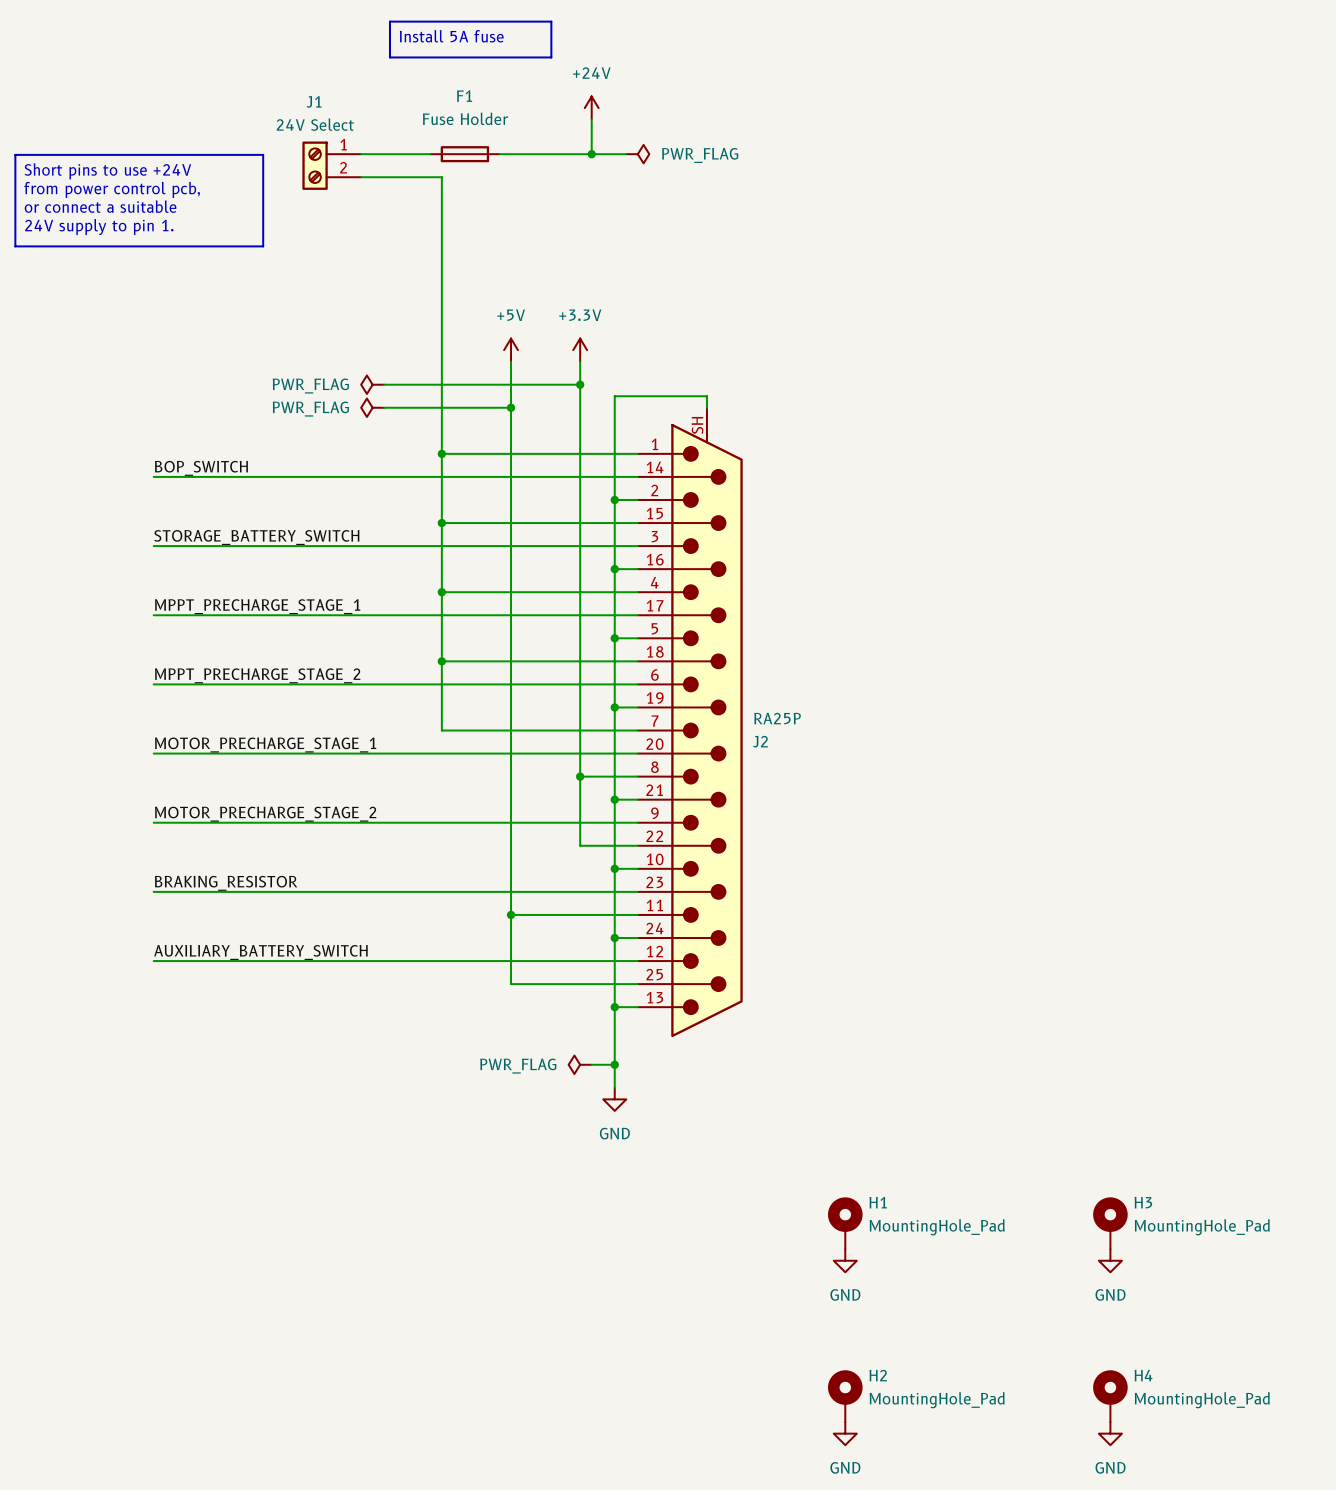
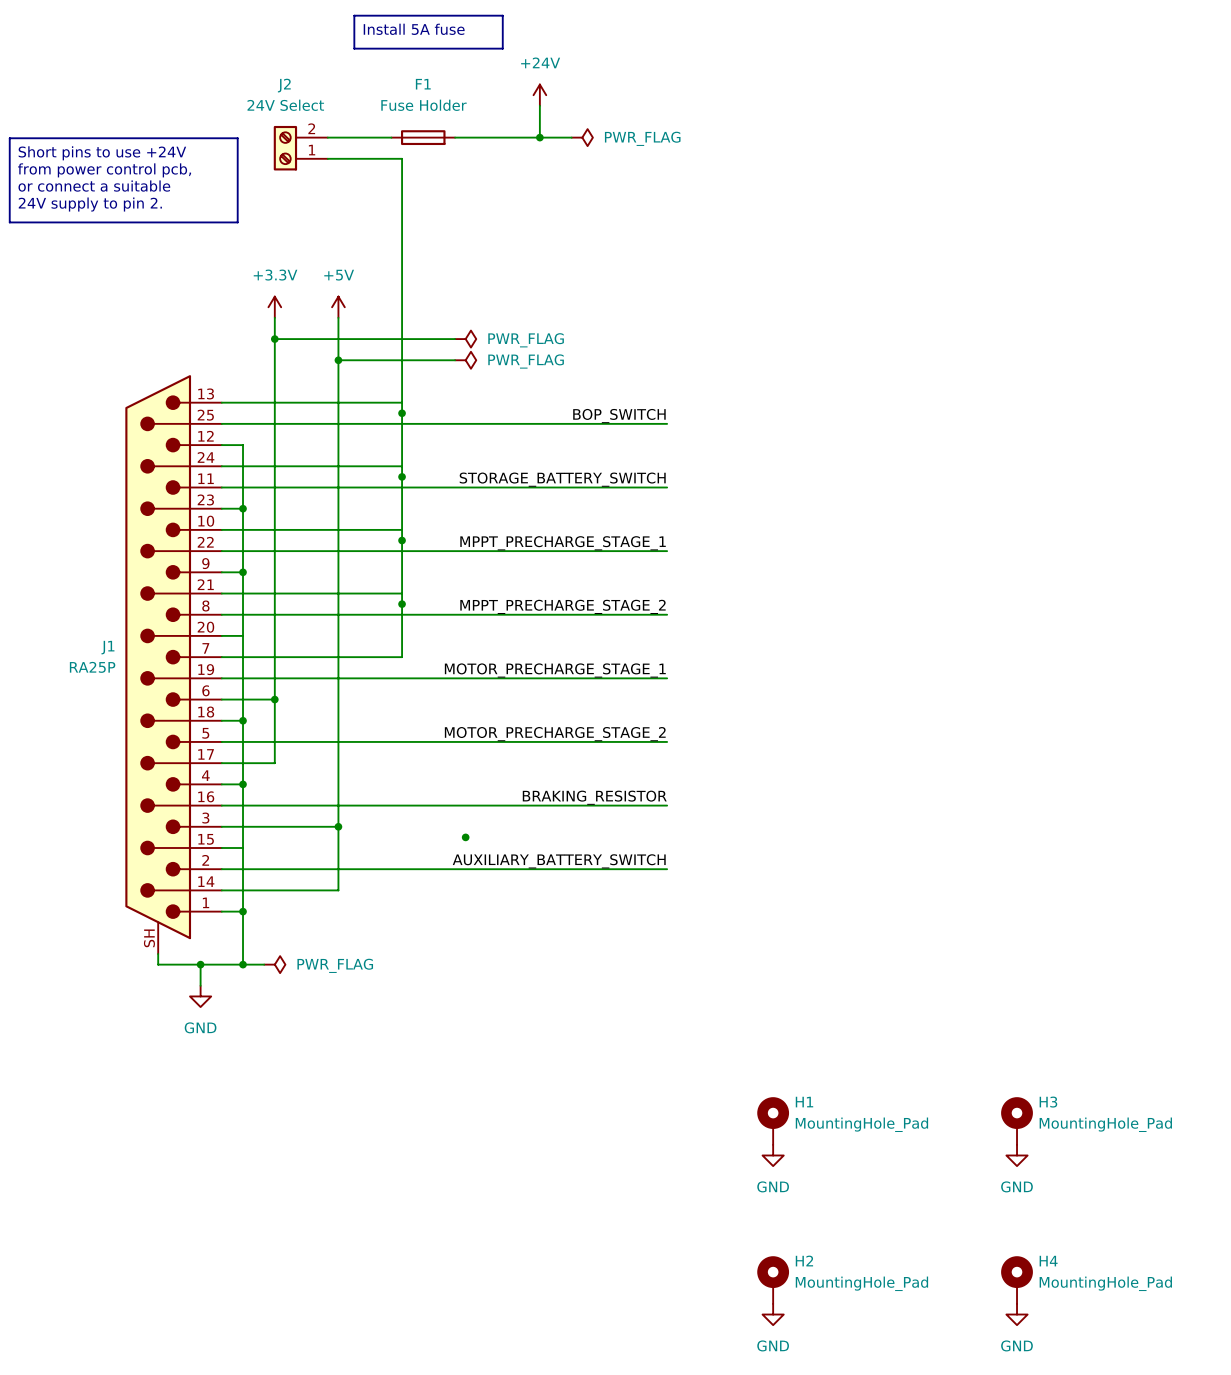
J1 name position: J1 (314, 101) -> J1 (107, 647)
J1 value: 24V Select (315, 124) -> RA25P (92, 667)
J1 symbol: [302, 141, 362, 190] -> [125, 375, 222, 955]
text: 24V supply to pin 1. (99, 227) -> 24V supply to pin 2. (90, 204)
power symbol: none -> +3.3V (274, 307)
wire: none -> (274, 317) (274, 763) (221, 763)
wire: none -> (338, 317) (338, 890) (221, 890)
power symbol position: +5V (511, 350) -> +5V (338, 307)
power symbol: +3.3V (580, 350) -> none
wire: (511, 361) (511, 984) (637, 984) -> none
wire: (580, 361) (580, 845) (637, 845) -> none
junction: none -> (274, 339)
power symbol: none -> PWR_FLAG (465, 339)
power symbol: PWR_FLAG (372, 384) -> none
wire: (384, 384) (580, 384) -> (274, 339) (455, 339)
junction: (580, 384) -> none
junction: none -> (338, 360)
power symbol: none -> PWR_FLAG (465, 360)
power symbol: PWR_FLAG (372, 407) -> none
wire: (384, 407) (511, 407) -> (338, 360) (455, 360)
junction: (511, 407) -> none
J2 symbol: [637, 407, 743, 1038] -> [273, 125, 328, 171]
wire: (706, 407) (706, 396) (614, 396) (614, 1087) -> none
wire: (441, 453) (637, 453) -> (221, 402) (402, 402)
label: none -> BOP_SWITCH (619, 416)
label: BOP_SWITCH (201, 468) -> none
wire: (153, 476) (637, 476) -> (221, 423) (667, 423)
wire: none -> (221, 445) (243, 445) (243, 964)
wire: (614, 499) (637, 499) -> none
junction: (614, 499) -> none
wire: (441, 523) (637, 523) -> (221, 466) (402, 466)
label: none -> STORAGE_BATTERY_SWITCH (562, 479)
label: STORAGE_BATTERY_SWITCH (256, 537) -> none
wire: (153, 546) (637, 546) -> (221, 487) (667, 487)
wire: none -> (221, 508) (243, 508)
junction: none -> (243, 508)
wire: (614, 569) (637, 569) -> none
junction: (614, 569) -> none
wire: (441, 592) (637, 592) -> (221, 529) (402, 529)
label: none -> MPPT_PRECHARGE_STAGE_1 (563, 543)
label: MPPT_PRECHARGE_STAGE_1 (257, 606) -> none
wire: (153, 615) (637, 615) -> (221, 551) (667, 551)
wire: none -> (221, 572) (243, 572)
junction: none -> (243, 572)
wire: (614, 638) (637, 638) -> none
junction: (614, 638) -> none
wire: (441, 661) (637, 661) -> (221, 593) (402, 593)
label: none -> MPPT_PRECHARGE_STAGE_2 (562, 606)
label: MPPT_PRECHARGE_STAGE_2 (257, 675) -> none
wire: (153, 684) (637, 684) -> (221, 614) (667, 614)
wire: none -> (221, 635) (243, 635)
wire: (614, 707) (637, 707) -> none
junction: (614, 707) -> none
wire: (441, 718) (441, 730) (637, 730) -> (402, 657) (221, 657)
J2 value: RA25P (777, 718) -> 24V Select (285, 105)
label: none -> MOTOR_PRECHARGE_STAGE_1 (555, 670)
J2 name position: J2 (760, 741) -> J2 (284, 85)
label: MOTOR_PRECHARGE_STAGE_1 (265, 745) -> none
wire: (153, 753) (637, 753) -> (221, 678) (667, 678)
wire: none -> (221, 699) (274, 699)
junction: none -> (274, 699)
wire: (580, 776) (637, 776) -> none
junction: (580, 776) -> none
wire: none -> (221, 720) (243, 720)
junction: none -> (243, 720)
wire: (614, 799) (637, 799) -> none
junction: (614, 799) -> none
label: none -> MOTOR_PRECHARGE_STAGE_2 (555, 734)
label: MOTOR_PRECHARGE_STAGE_2 (265, 814) -> none
wire: (153, 822) (637, 822) -> (221, 741) (667, 741)
wire: none -> (221, 784) (243, 784)
junction: none -> (243, 784)
wire: (614, 868) (637, 868) -> none
junction: (614, 868) -> none
label: none -> BRAKING_RESISTOR (594, 797)
label: BRAKING_RESISTOR (226, 883) -> none
wire: (153, 891) (637, 891) -> (221, 805) (667, 805)
wire: none -> (221, 826) (338, 826)
junction: none -> (338, 826)
wire: (511, 914) (637, 914) -> none
wire: none -> (221, 848) (243, 848)
wire: (614, 938) (637, 938) -> none
junction: (614, 938) -> none
label: none -> AUXILIARY_BATTERY_SWITCH (559, 861)
label: AUXILIARY_BATTERY_SWITCH (260, 952) -> none
wire: (153, 961) (637, 961) -> (221, 869) (667, 869)
wire: none -> (221, 911) (243, 911)
junction: none -> (243, 911)
wire: (614, 1007) (637, 1007) -> none
junction: (614, 1007) -> none
wire: none -> (158, 954) (158, 964) (264, 964)
wire: none -> (200, 964) (200, 985)
junction: none -> (200, 964)
junction: none -> (243, 964)
power symbol: none -> PWR_FLAG (274, 964)
power symbol: PWR_FLAG (580, 1064) -> none
wire: (591, 1064) (614, 1064) -> none
junction: (614, 1064) -> none
power symbol: none -> GND (200, 996)
power symbol: GND (614, 1099) -> none

